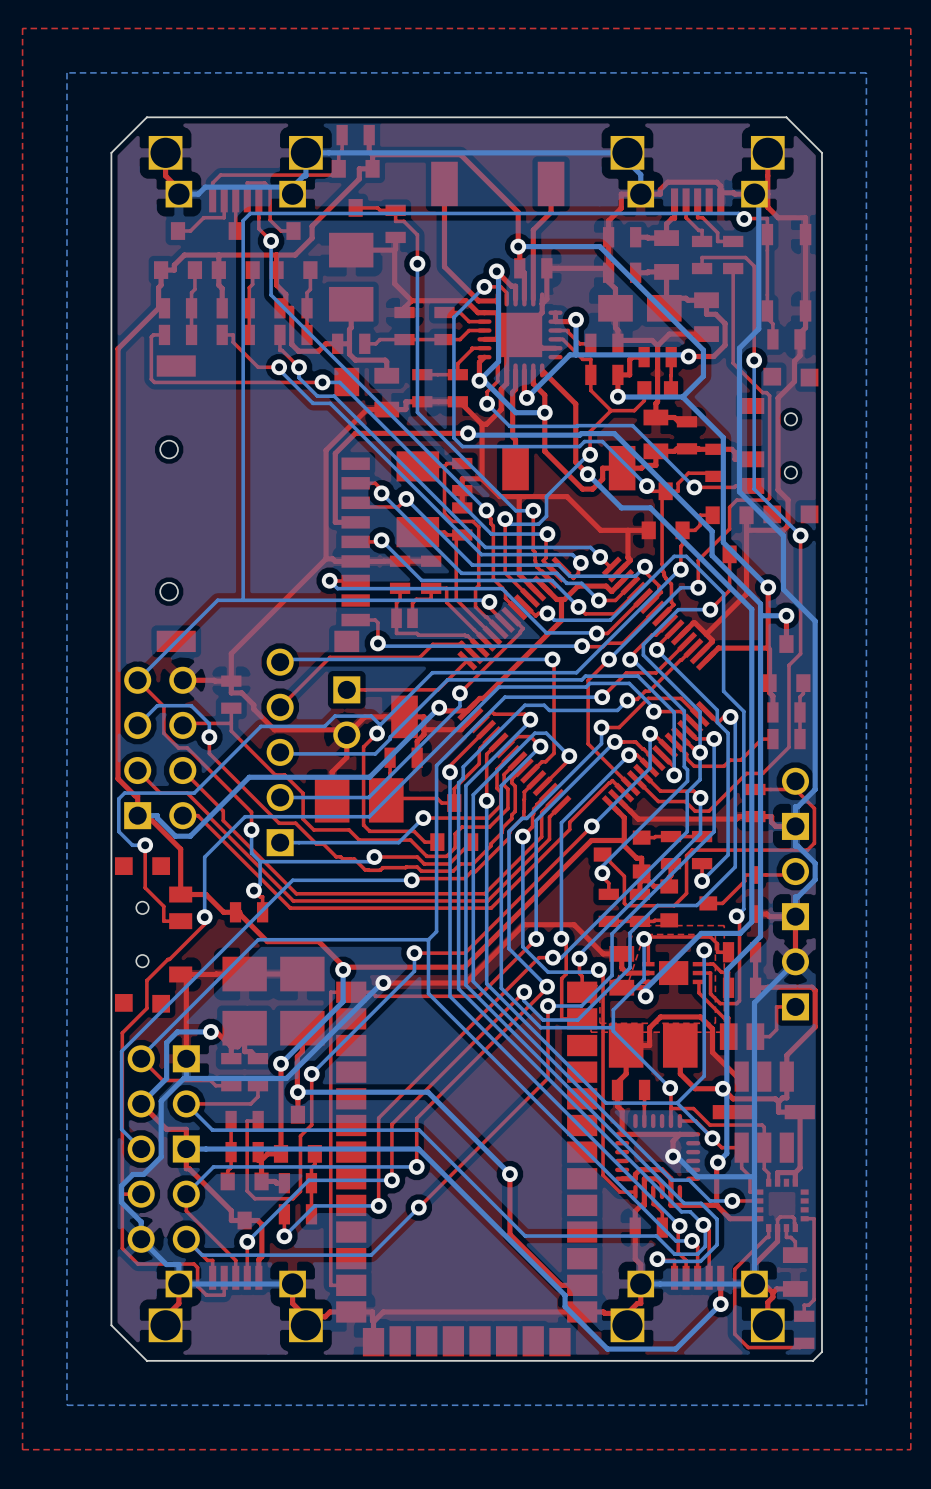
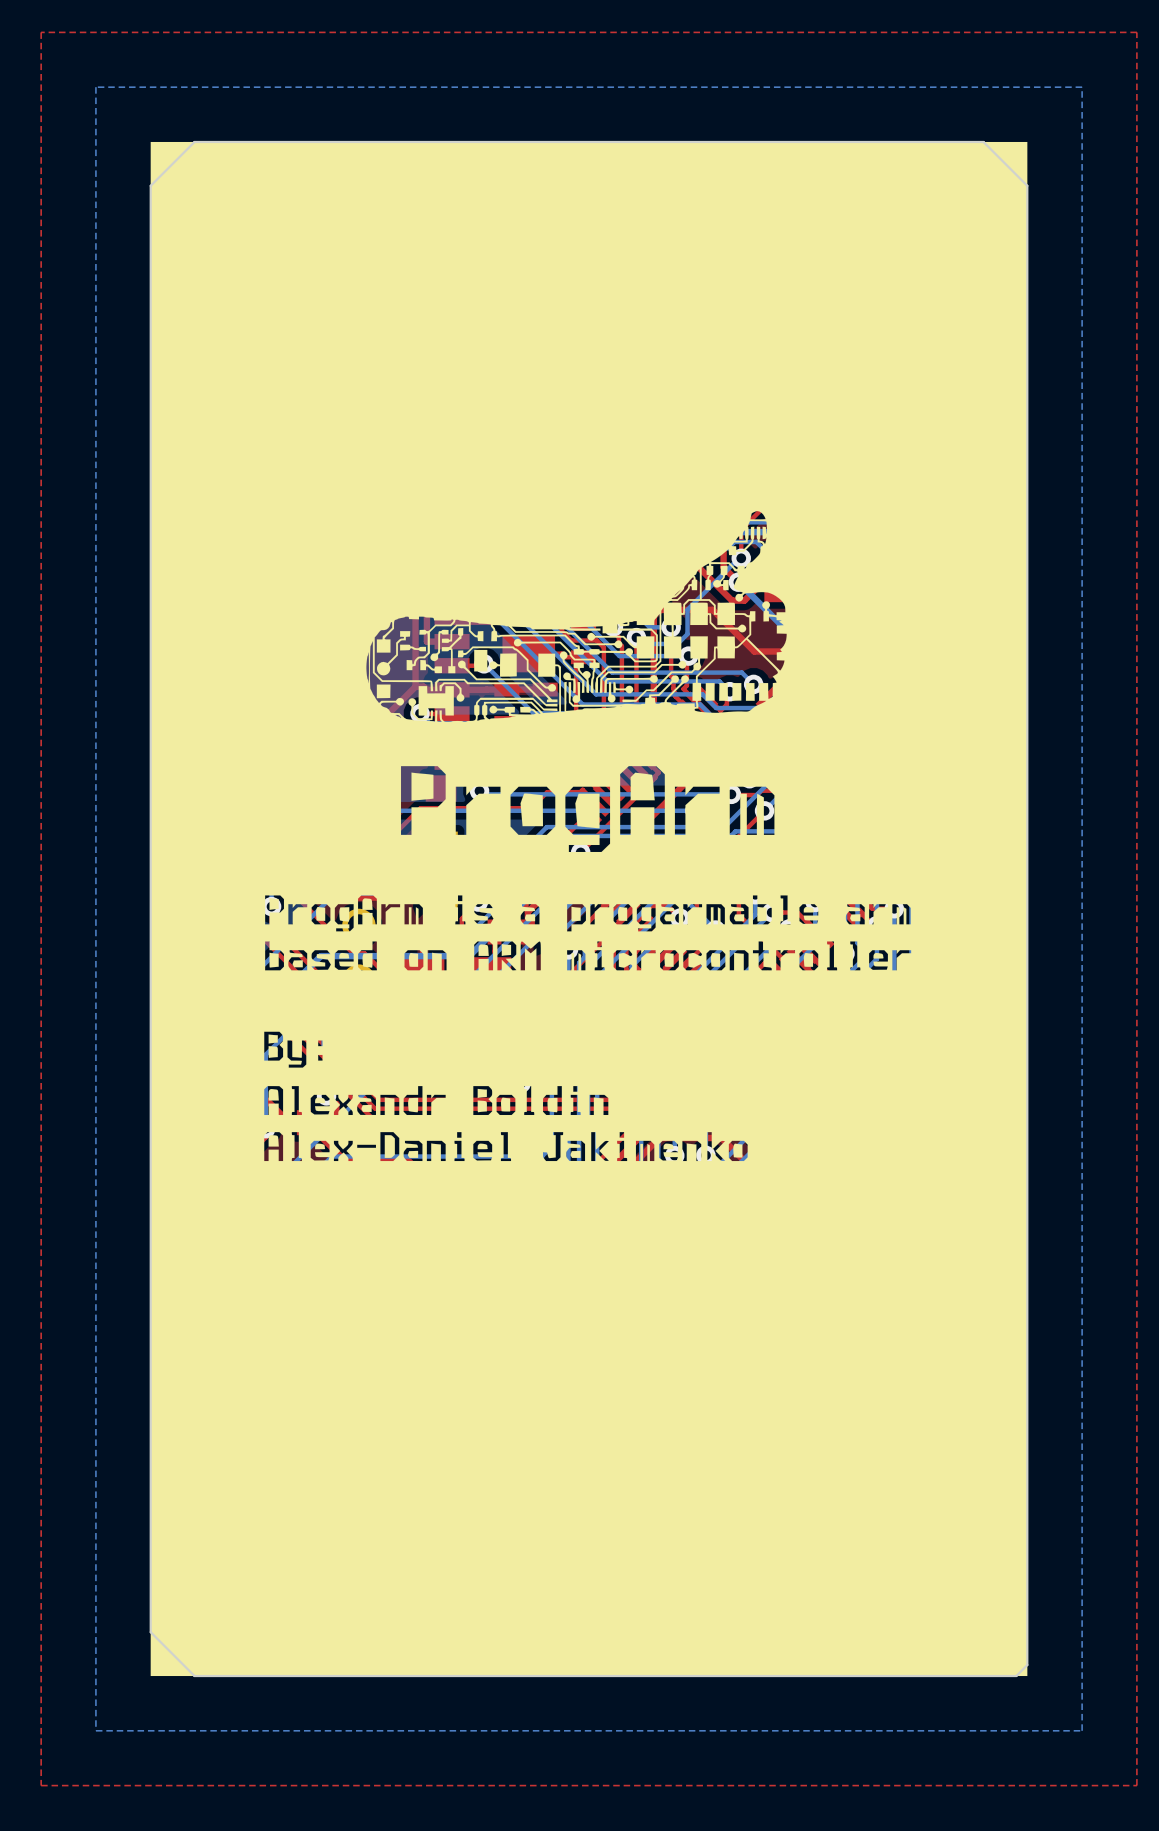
drawing: none -> [150, 141, 1028, 1677]

